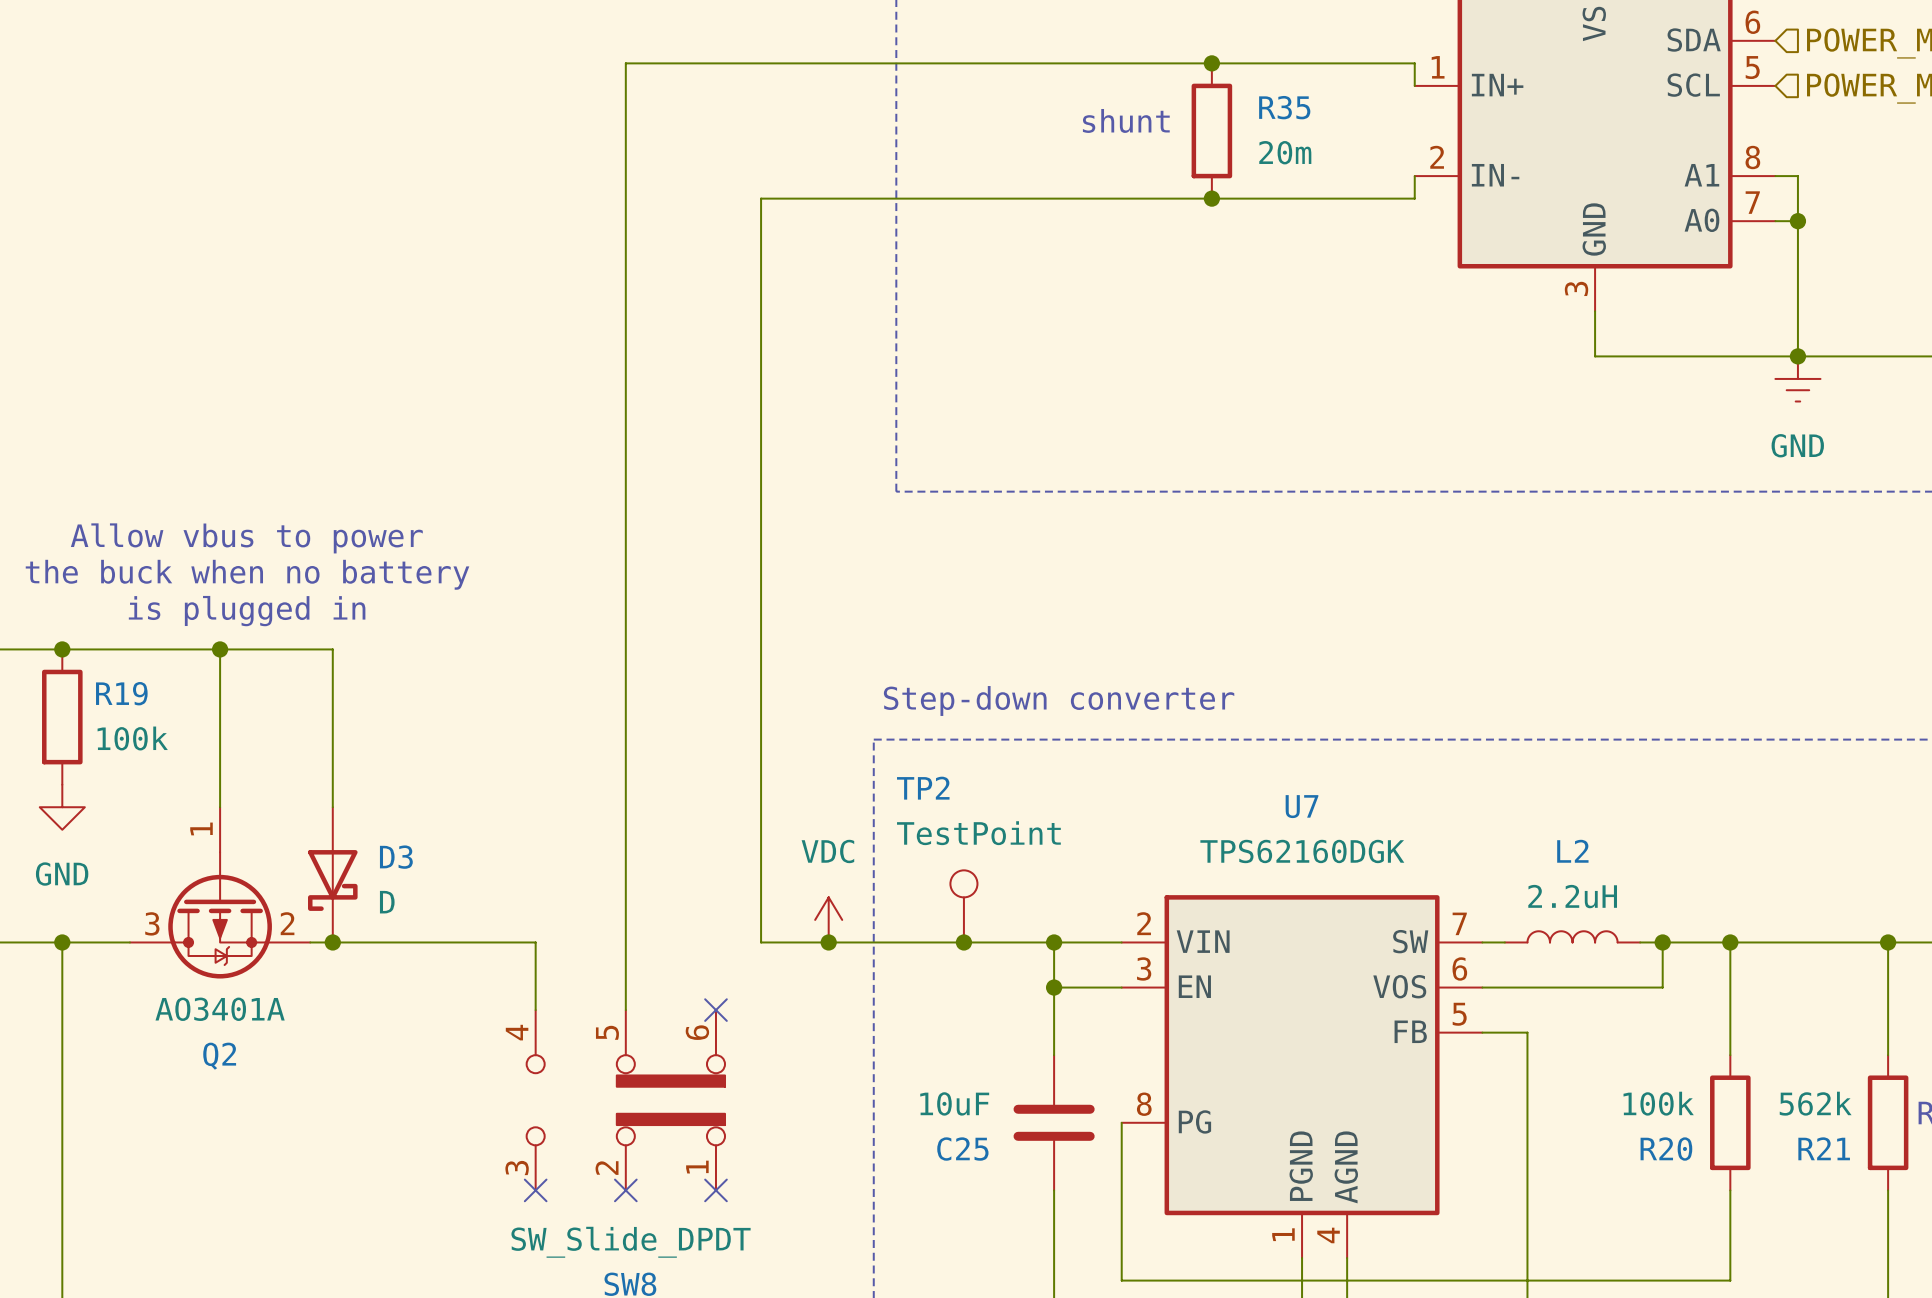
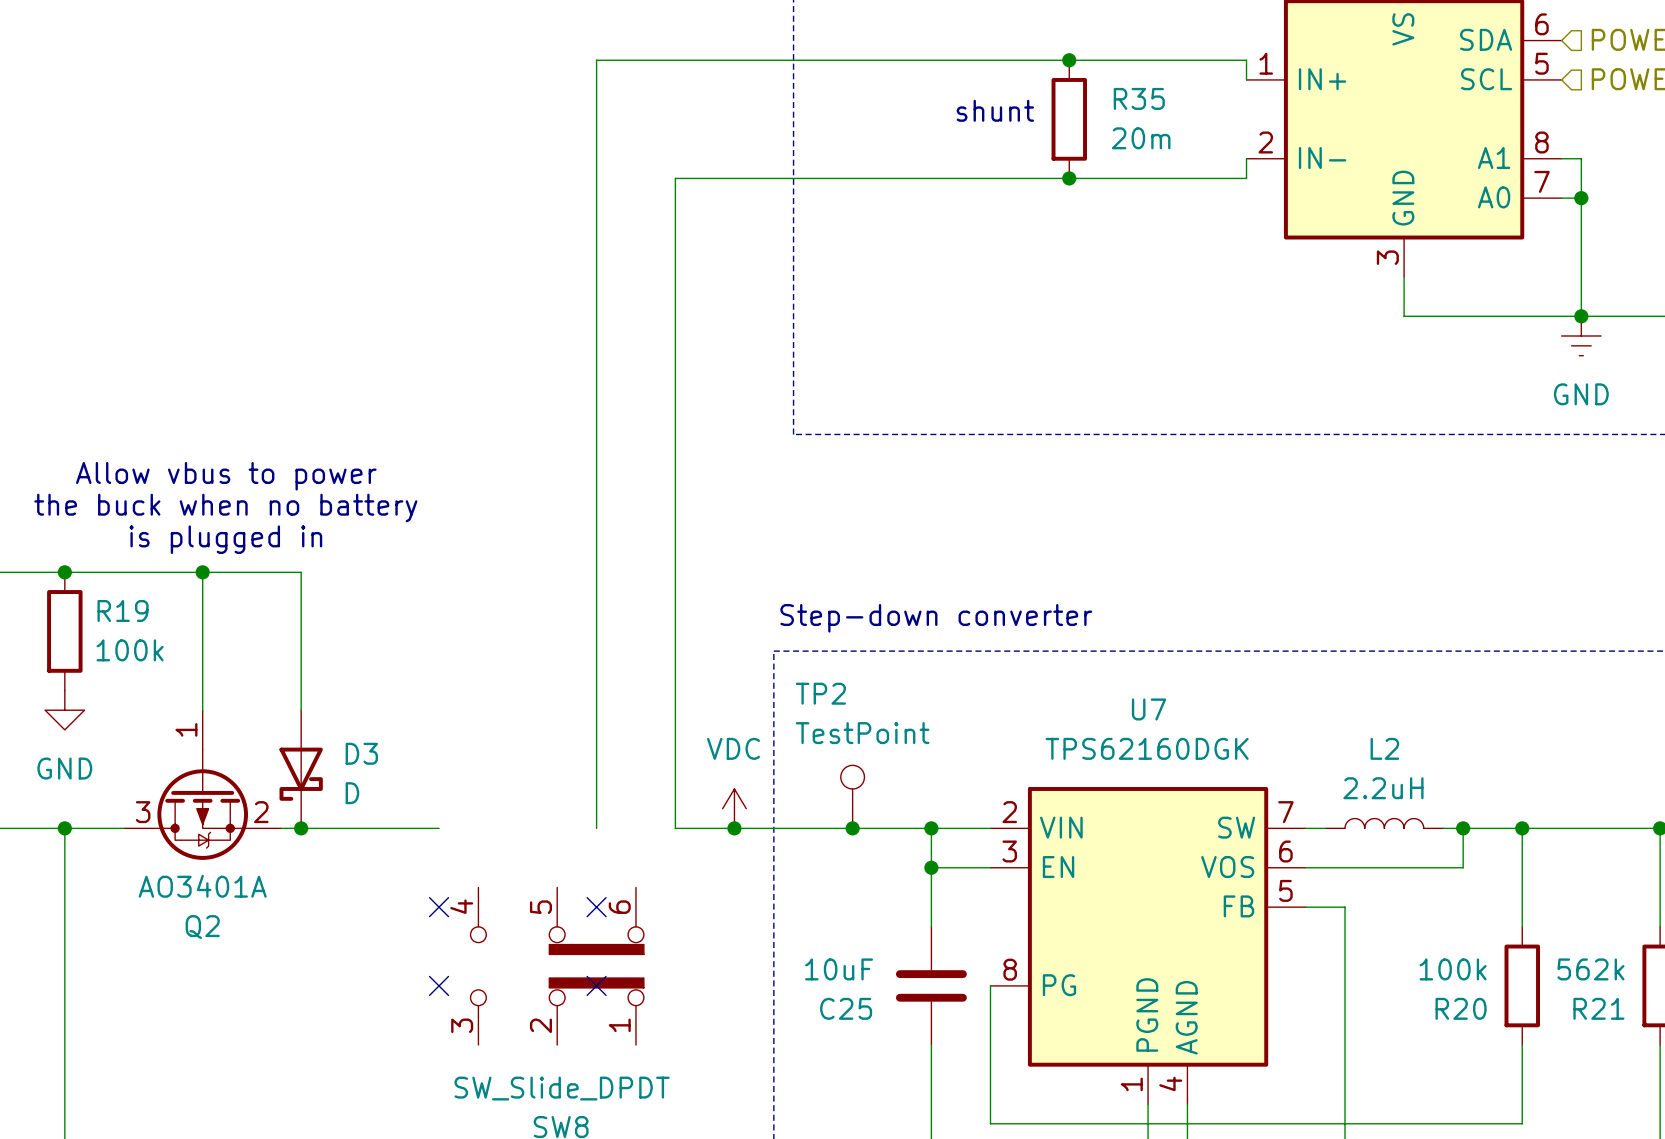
wire: (670, 63) (625, 63) (625, 1010) -> (596, 60) (596, 828)
wire: (490, 942) (535, 942) (535, 1010) -> none
no-connect mark position: (715, 1010) -> (596, 907)
no-connect mark: none -> (439, 907)
no-connect mark: none -> (439, 985)
no-connect mark: none -> (596, 985)
no-connect mark: (535, 1190) -> none
no-connect mark: (625, 1190) -> none
no-connect mark: (715, 1190) -> none

